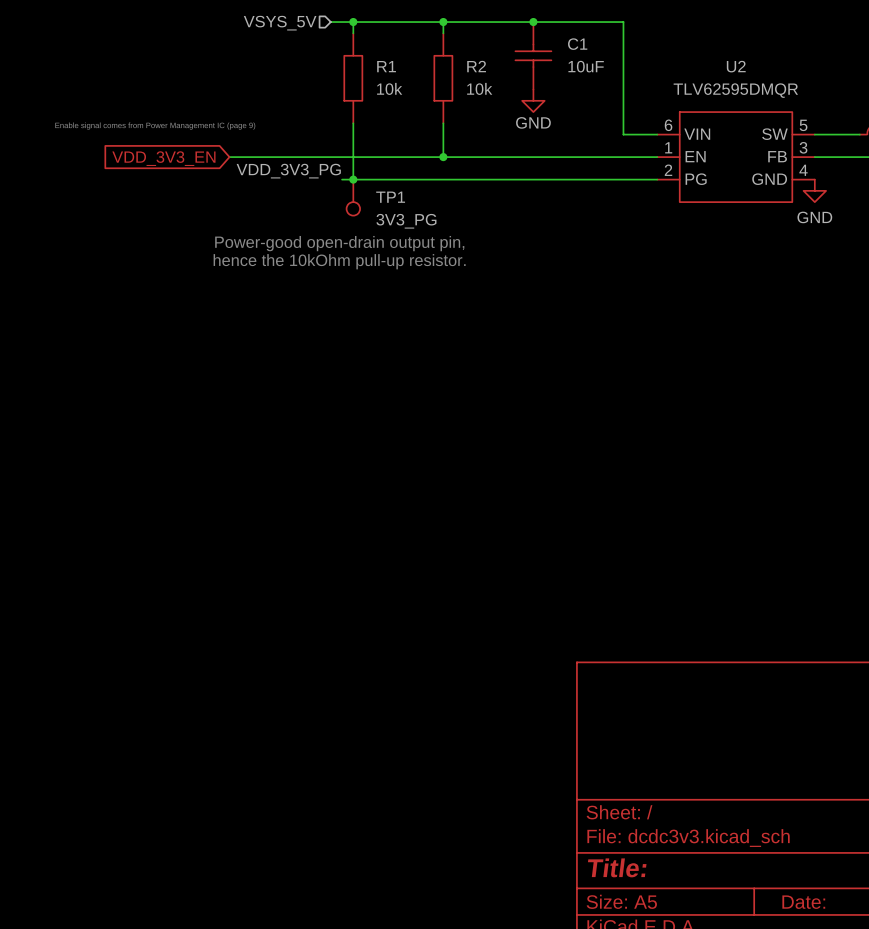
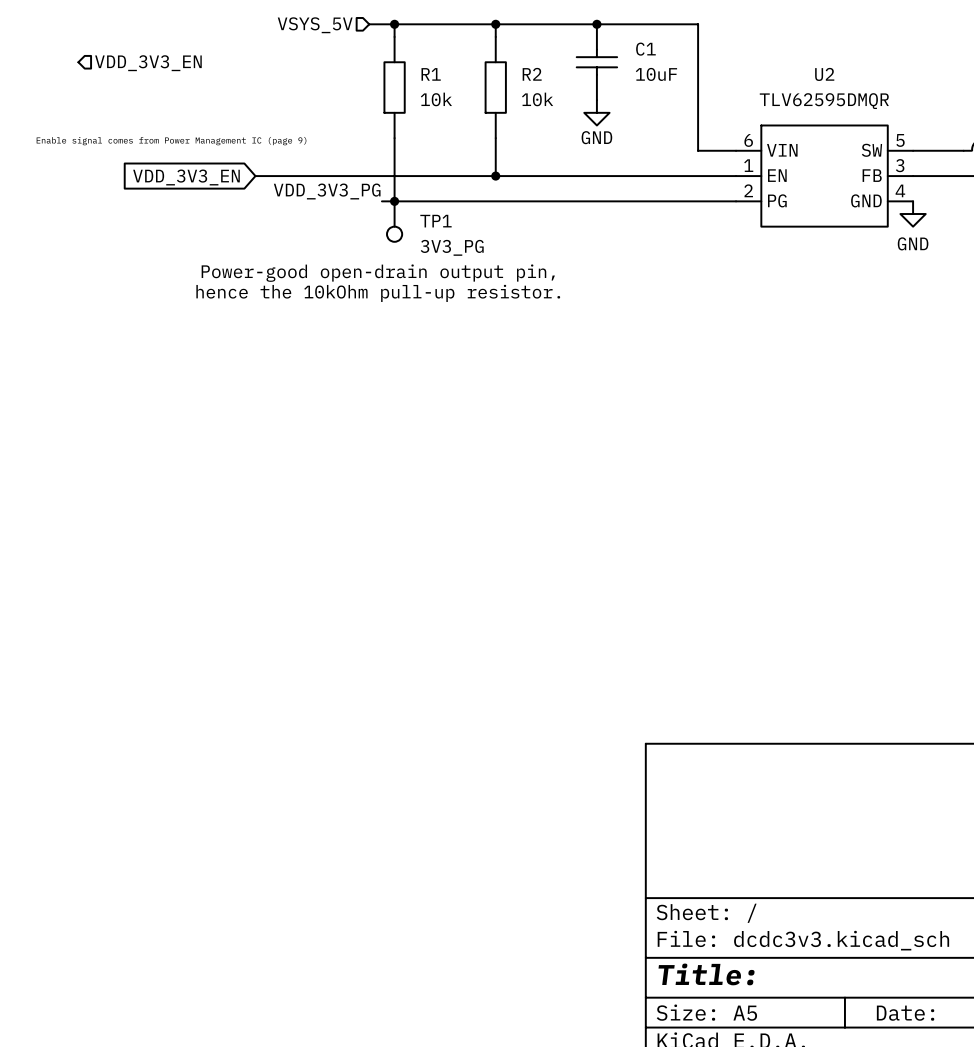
hierarchical label: none -> VDD_3V3_EN (148, 63)

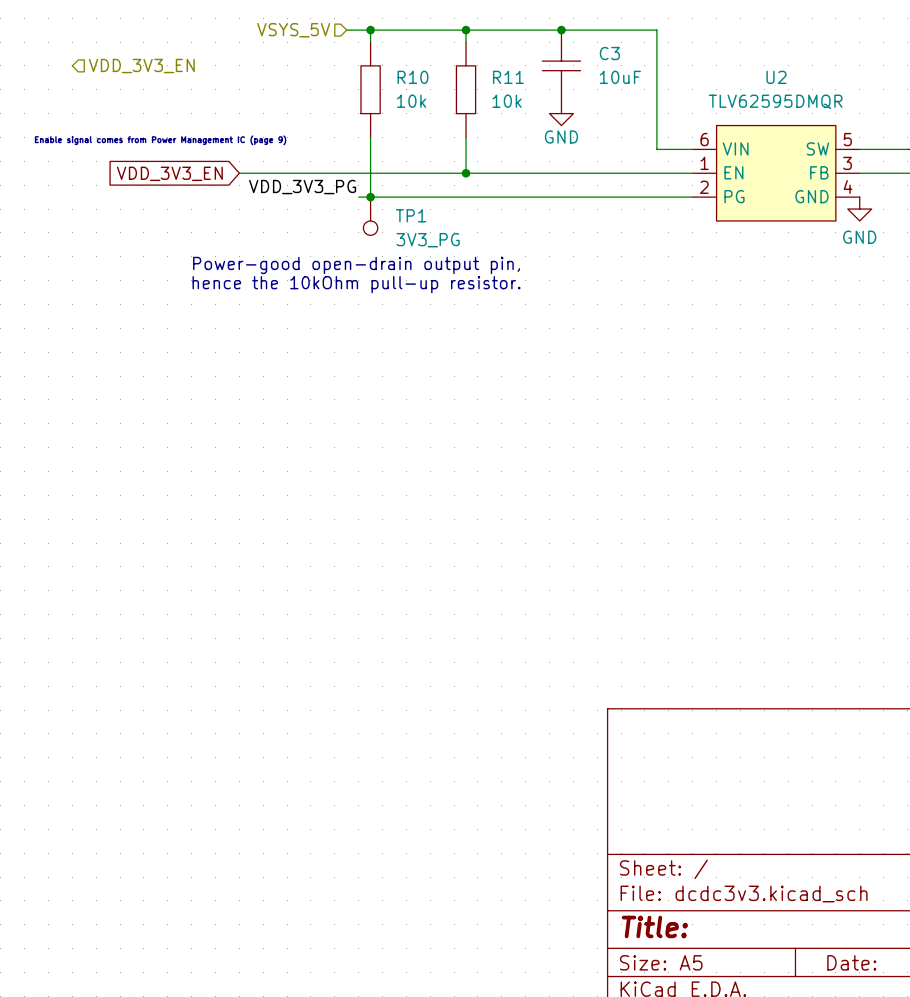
C1 name: C1 (645, 49) -> C3 (609, 53)
R1 name: R1 (431, 74) -> R10 (413, 77)
R2 name: R2 (532, 74) -> R11 (508, 77)

